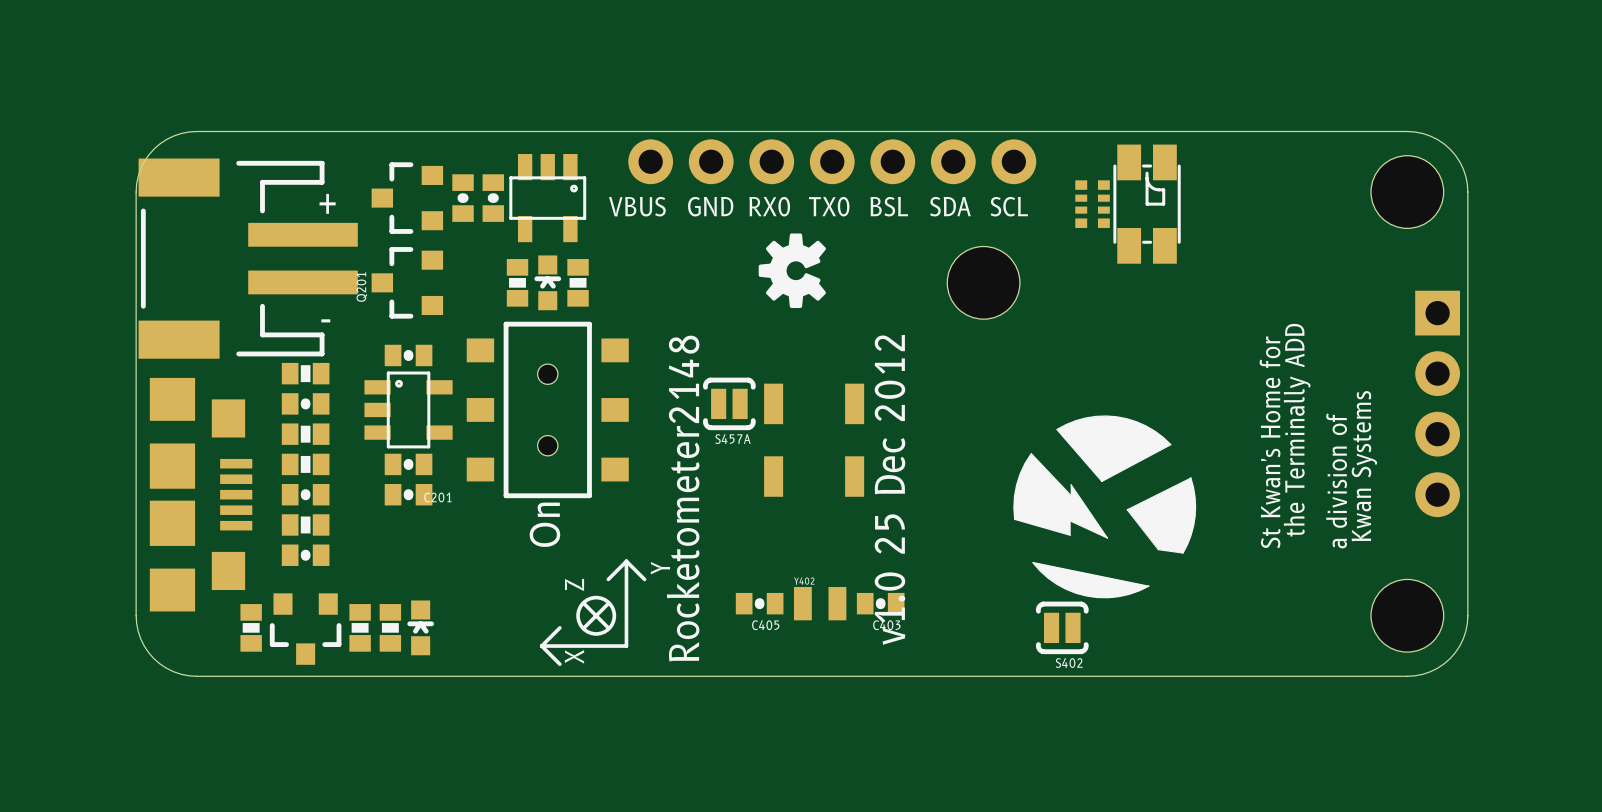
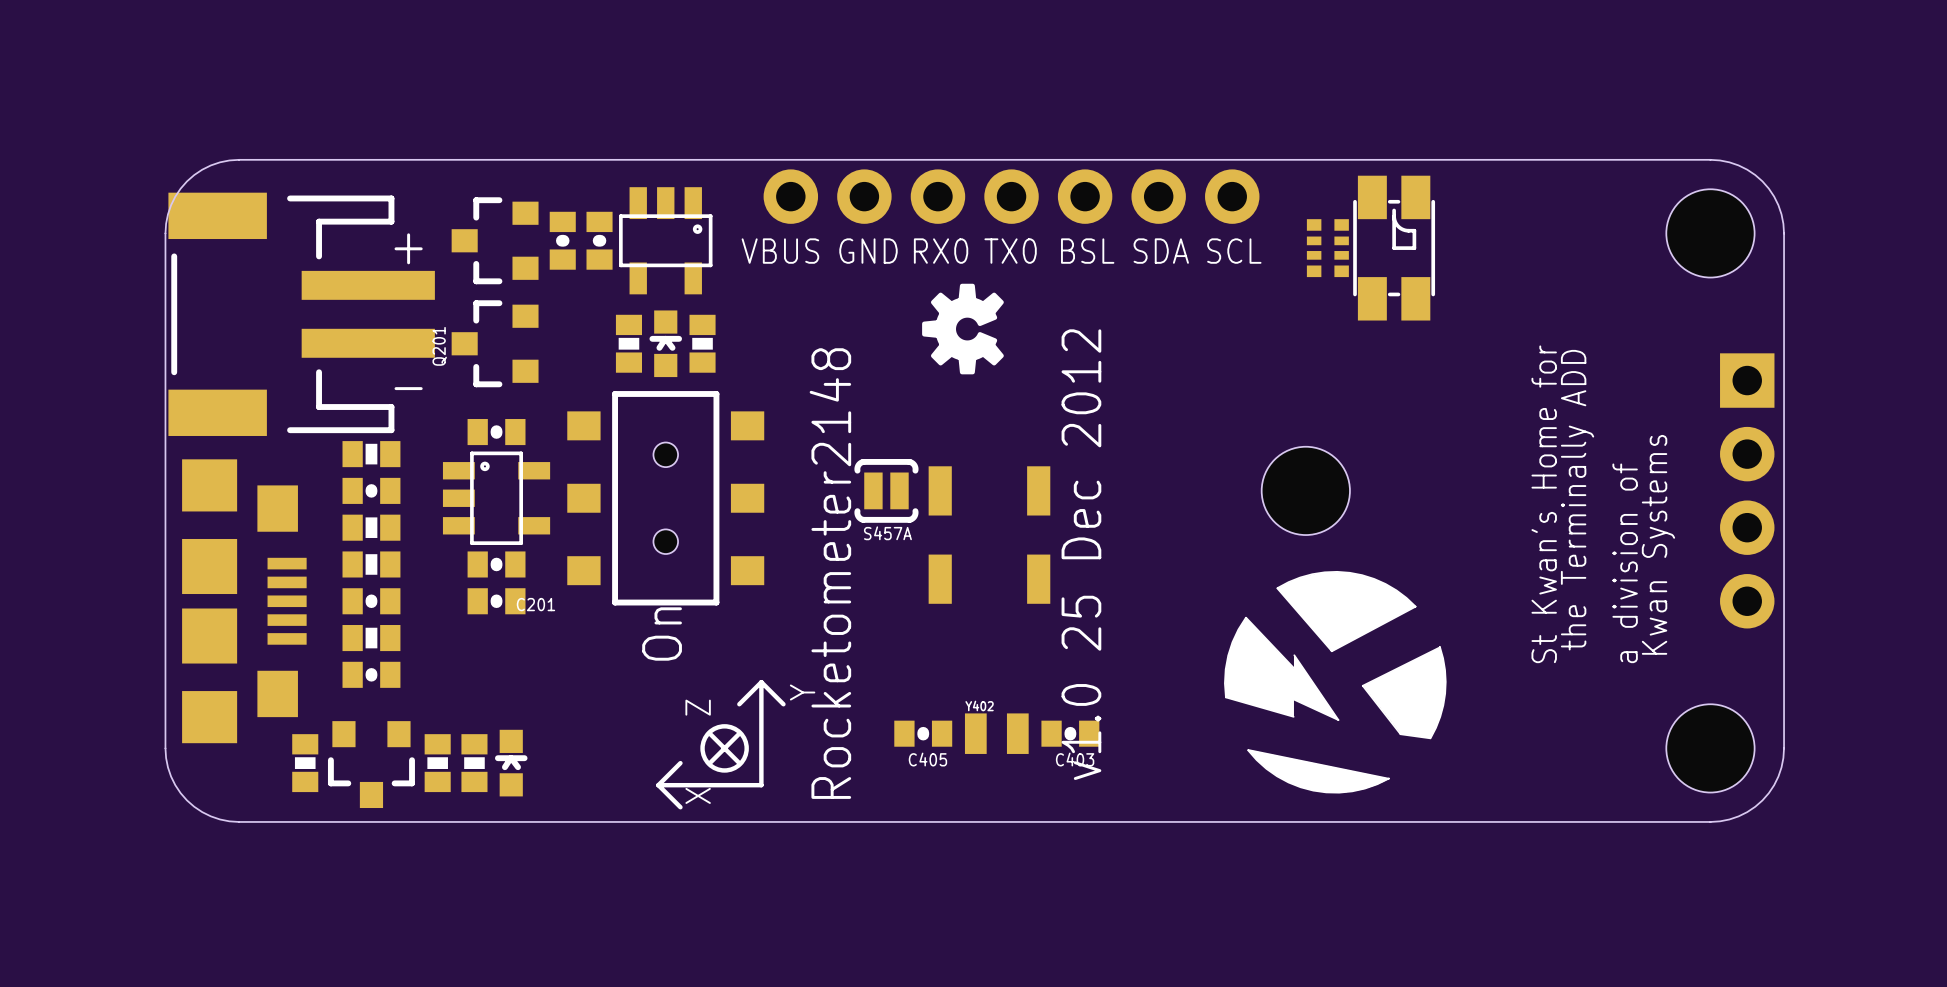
part position: (983, 282) -> (1305, 490)
drawing position: (1104, 506) -> (1335, 682)
S402: (1062, 627) -> none

